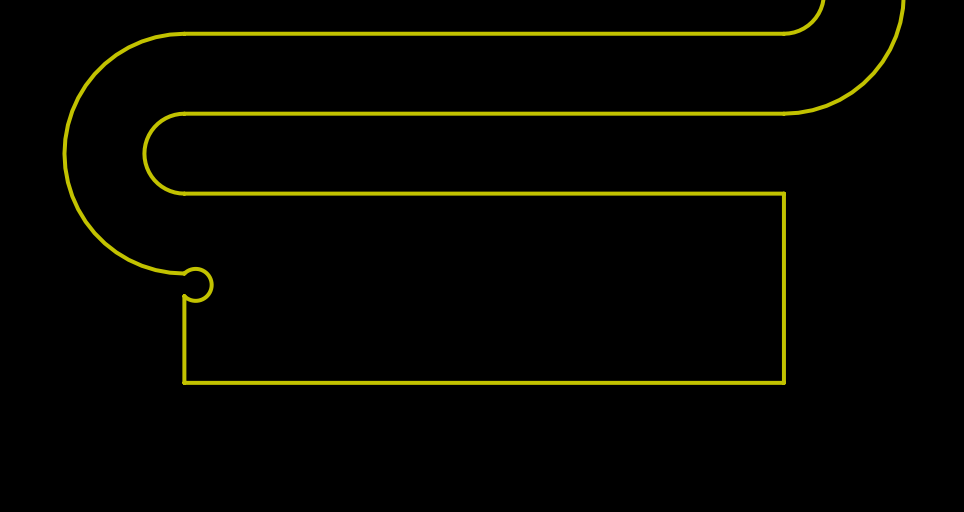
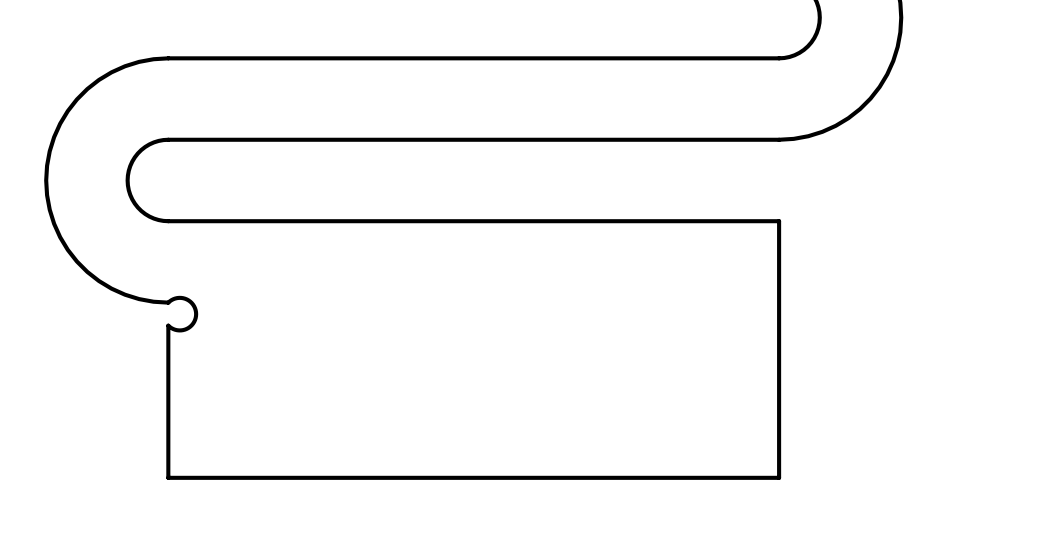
board edge: (184, 382) (783, 382) -> (168, 413) (168, 477) (779, 477) (779, 413)

